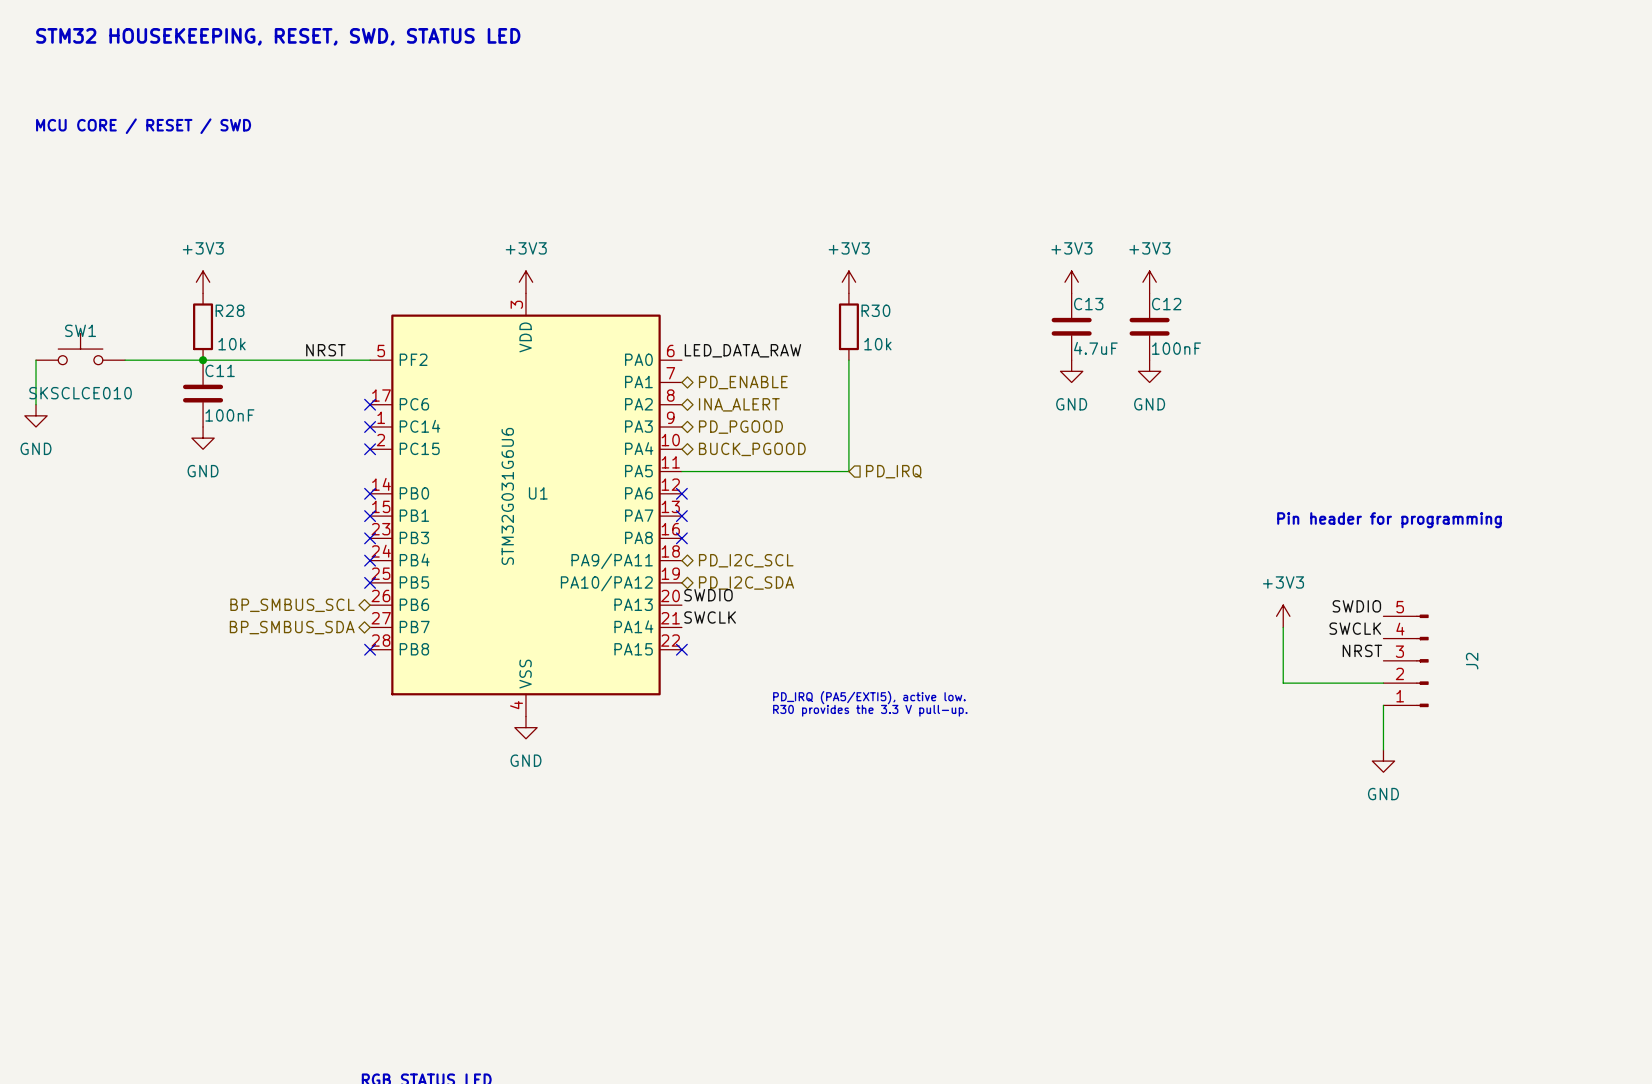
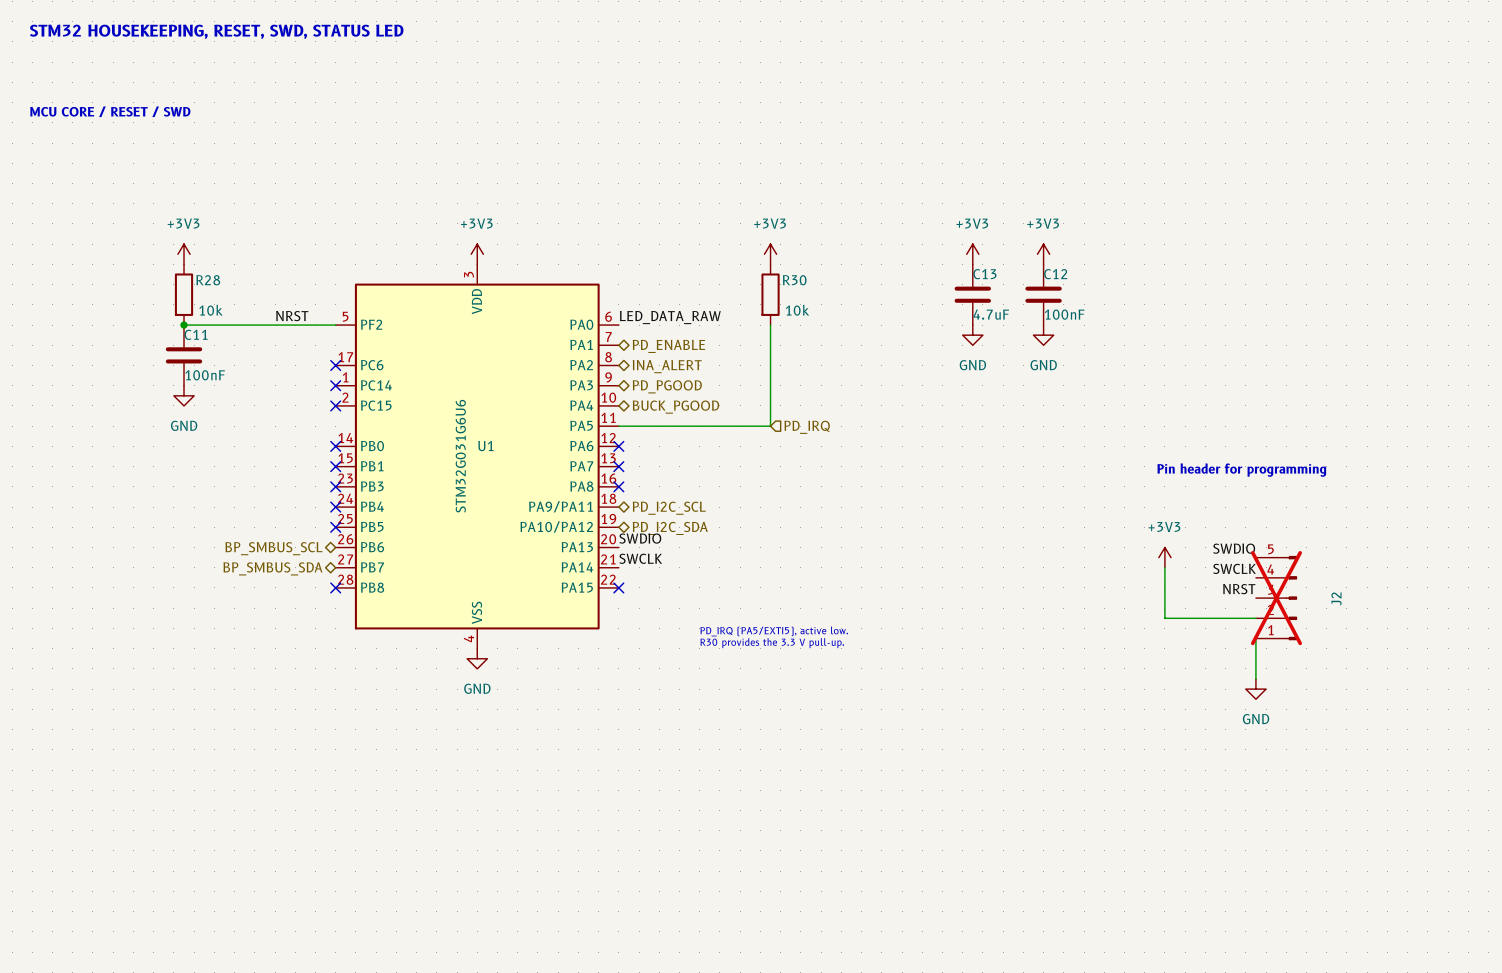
SW1: SKSCLCE010 (80, 349) -> none
wire: (36, 360) (36, 404) -> none
wire: (125, 360) (203, 360) -> none
power symbol: GND (36, 415) -> none
J2 do-not-place cross: none -> (1276, 598)

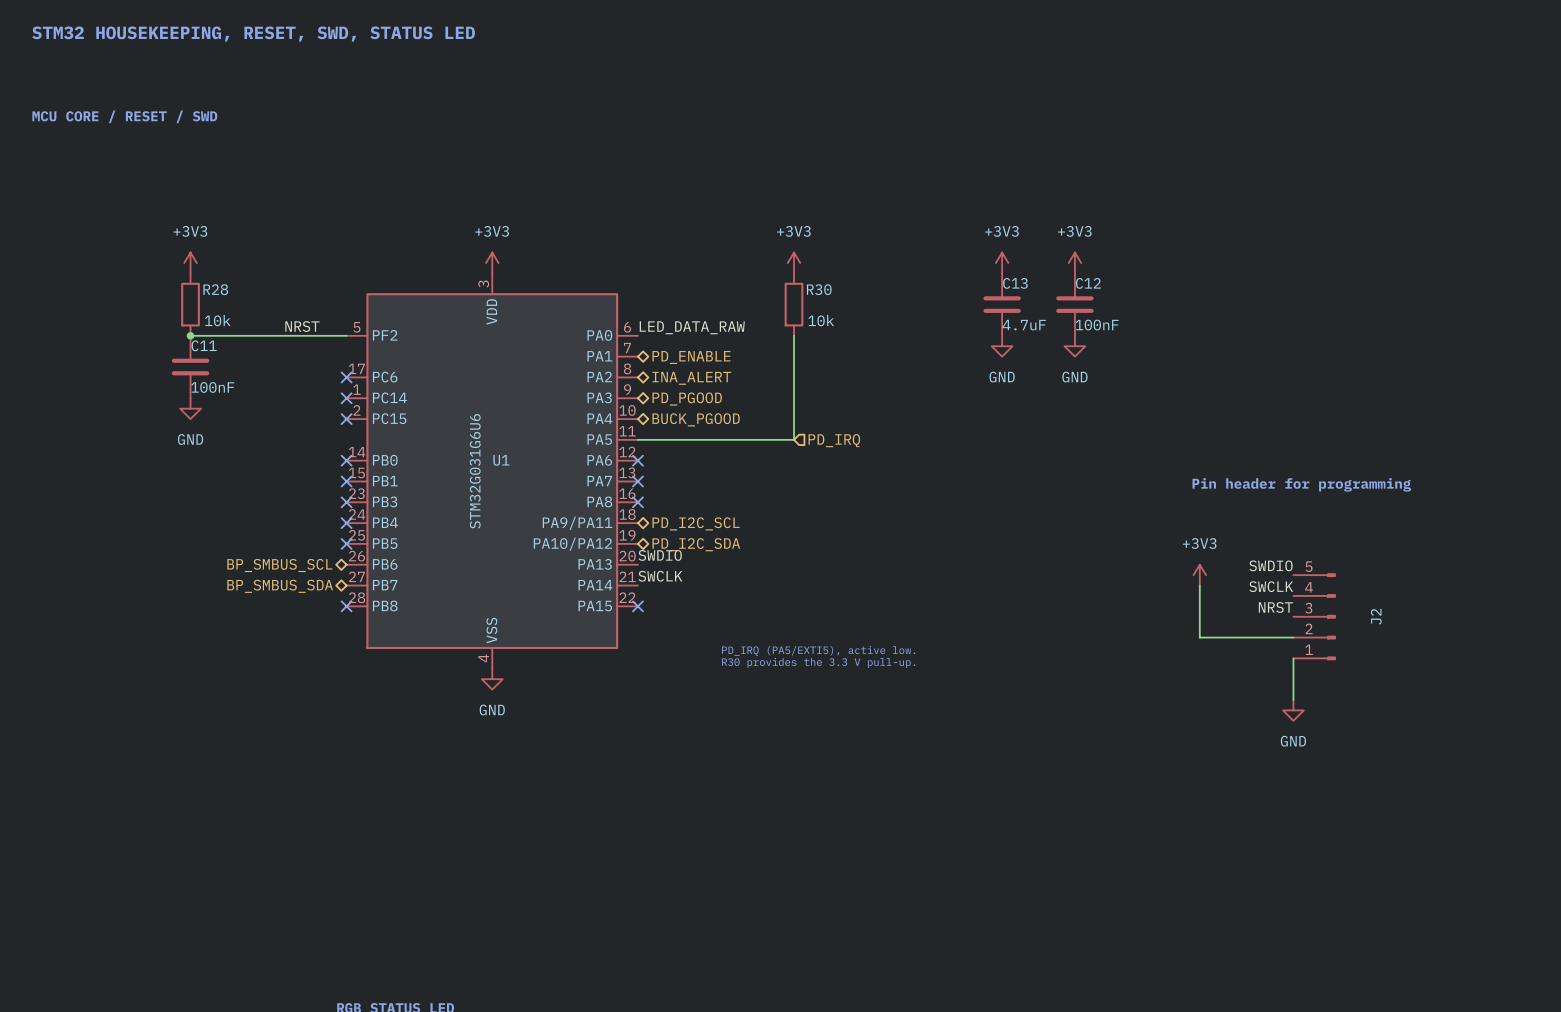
J2 do-not-place cross: (1276, 598) -> none

